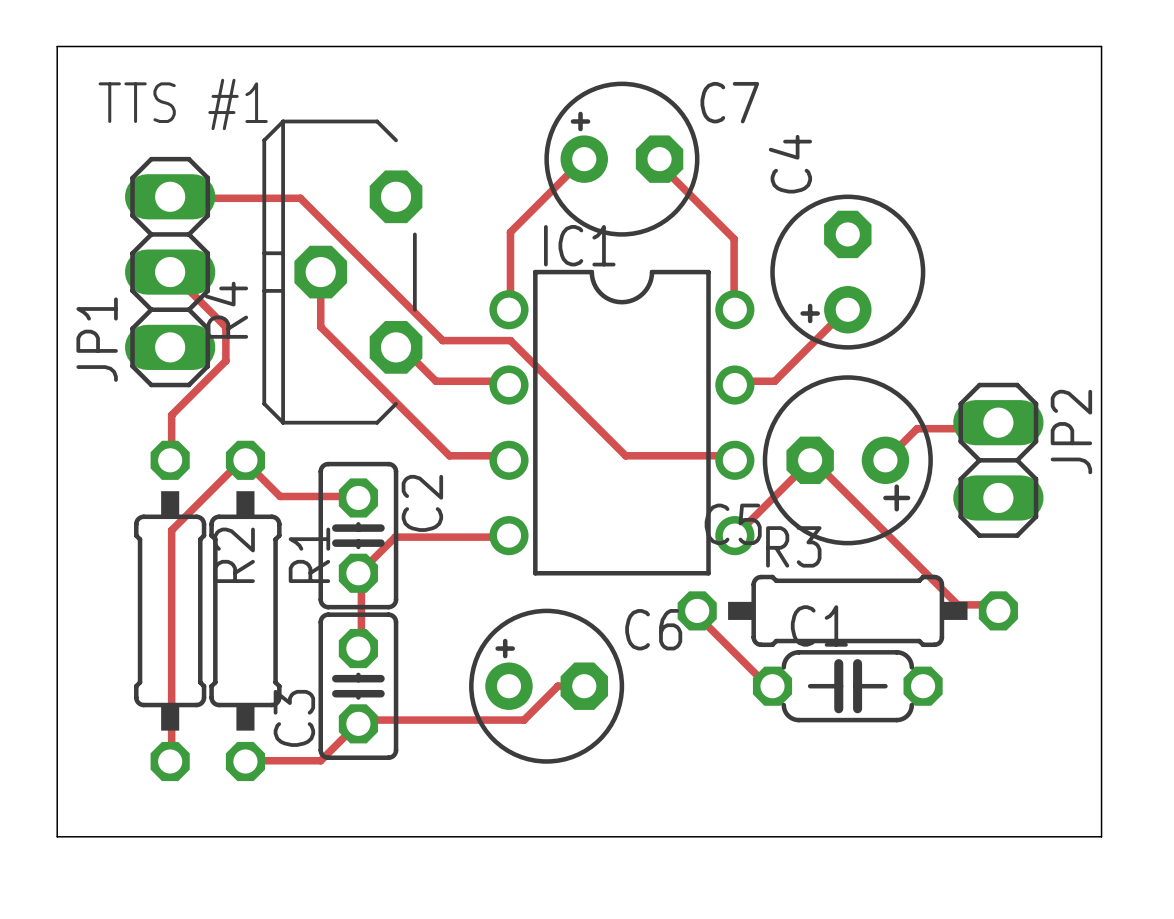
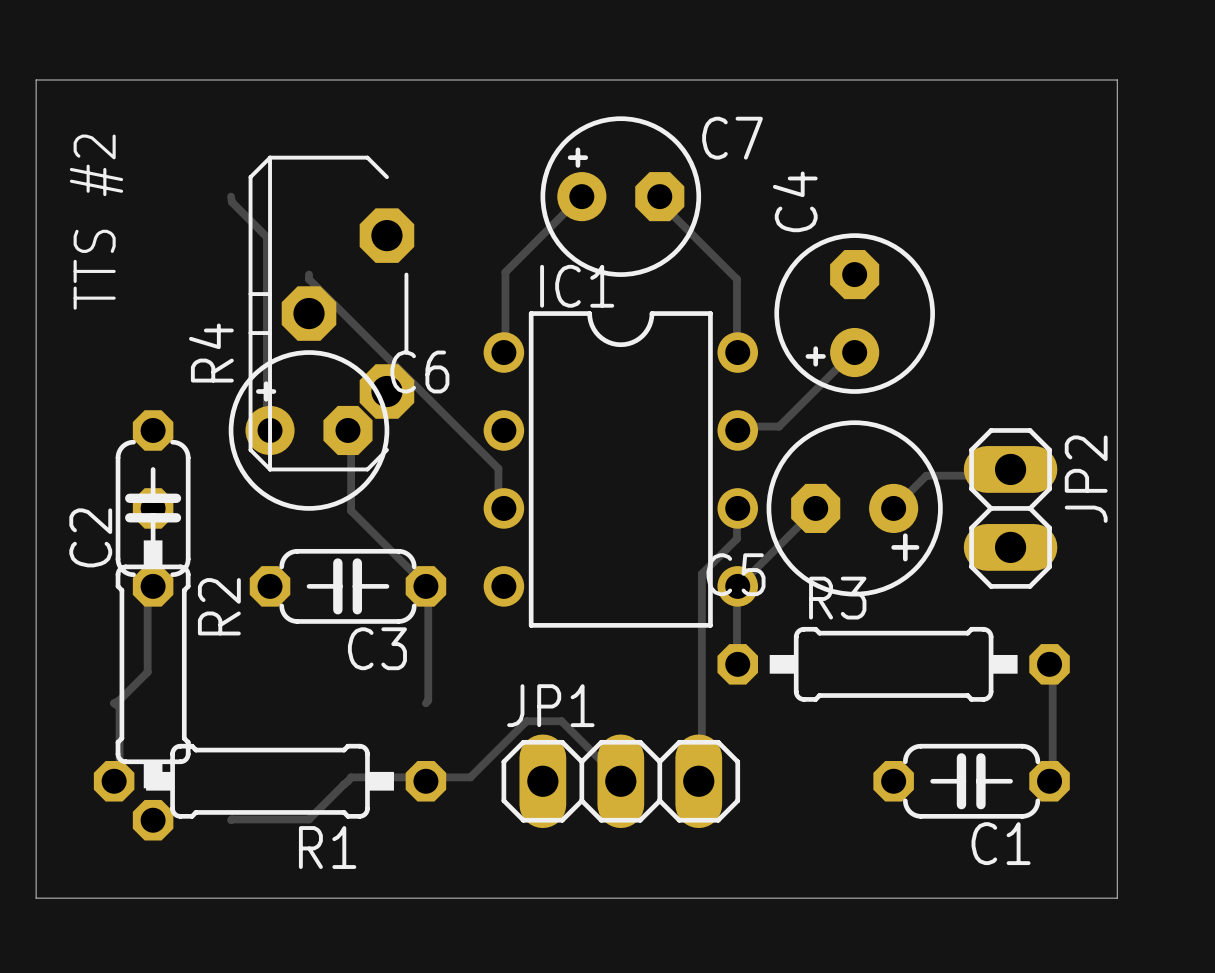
text: TTS #1 (183, 104) -> TTS #2 (96, 222)
track: none -> (231, 196) (231, 202) (266, 237) (266, 426) (270, 430)
track: (170, 196) (300, 198) (442, 340) (510, 340) (625, 455) (734, 455) (734, 460) -> (698, 781) (701, 777) (701, 573) (736, 538) (737, 508)
track: (170, 272) (225, 327) (225, 360) (171, 415) (170, 460) -> none
JP1 rotation: 0° (170, 272) -> 90° clockwise (620, 781)
JP1 position: (170, 272) -> (620, 781)
track: (320, 272) (320, 327) (449, 455) (503, 455) -> (309, 274) (309, 279) (498, 468) (498, 503)
track: (396, 347) (402, 347) (435, 381) (503, 381) (508, 385) -> none
track: none -> (347, 430) (351, 433) (351, 510) (428, 587) (428, 700) (425, 703)
track: (810, 460) (815, 462) (957, 604) (998, 604) (998, 610) -> none
C2 footprint: [318, 461, 399, 610] -> [115, 410, 191, 607]
track: (358, 497) (280, 496) (245, 460) (239, 462) (171, 530) (171, 760) (170, 761) -> none
C2 name position: C2 (422, 503) -> C2 (90, 537)
track: none -> (153, 586) (147, 587) (147, 672) (114, 703) (119, 707) (119, 777) (114, 781)
track: (508, 535) (395, 537) (358, 573) (361, 577) (361, 645) (358, 648) -> none
track: none -> (737, 586) (737, 664)
R1 rotation: 0° (245, 610) -> 90° clockwise (270, 781)
track: (697, 610) (693, 611) (767, 686) (772, 686) -> none
R3 position: (847, 610) -> (893, 664)
track: none -> (1049, 664) (1052, 665) (1052, 777) (1049, 781)
C3 footprint: [318, 612, 399, 760] -> [249, 548, 447, 624]
C6 position: (546, 686) -> (309, 430)
track: (584, 686) (557, 686) (524, 720) (476, 720) -> (620, 781) (561, 721) (526, 721) (470, 777)
C1 rotation: 0° (847, 686) -> 180° (971, 781)
C1 position: (847, 686) -> (971, 781)
C3 name position: C3 (294, 718) -> C3 (377, 648)

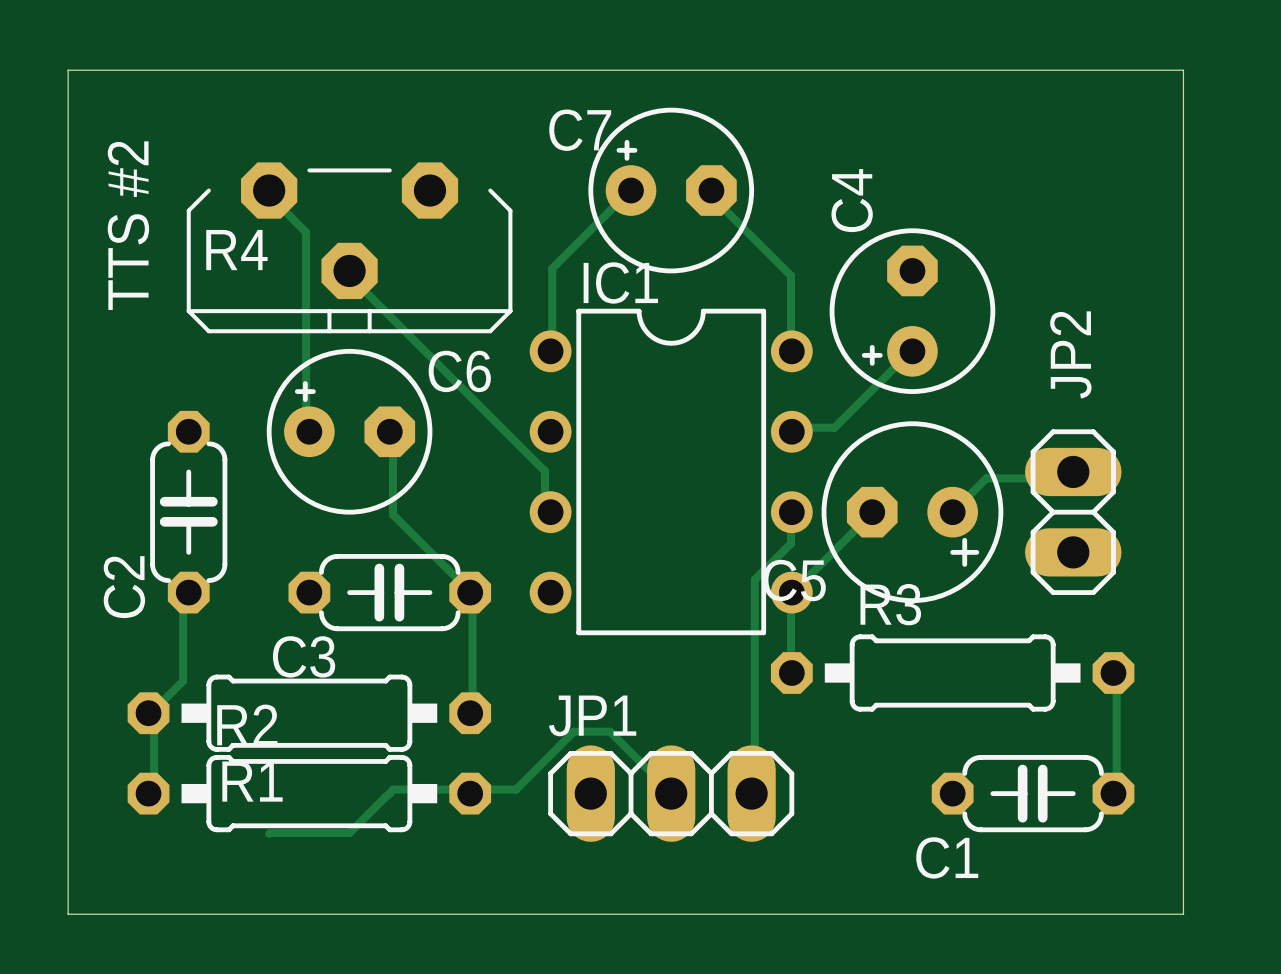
C7 name position: C7 (732, 138) -> C7 (580, 130)
R4 rotation: 0° (331, 313) -> 90° counterclockwise (349, 247)
JP2 name position: JP2 (1086, 479) -> JP2 (1070, 354)
C2 name position: C2 (90, 537) -> C2 (124, 587)
R2 name position: R2 (219, 606) -> R2 (247, 724)
C3 name position: C3 (377, 648) -> C3 (304, 656)
R2 rotation: 0° (153, 664) -> 90° clockwise (309, 713)
C1 name position: C1 (1001, 843) -> C1 (947, 857)
R1 name position: R1 (327, 847) -> R1 (252, 781)

